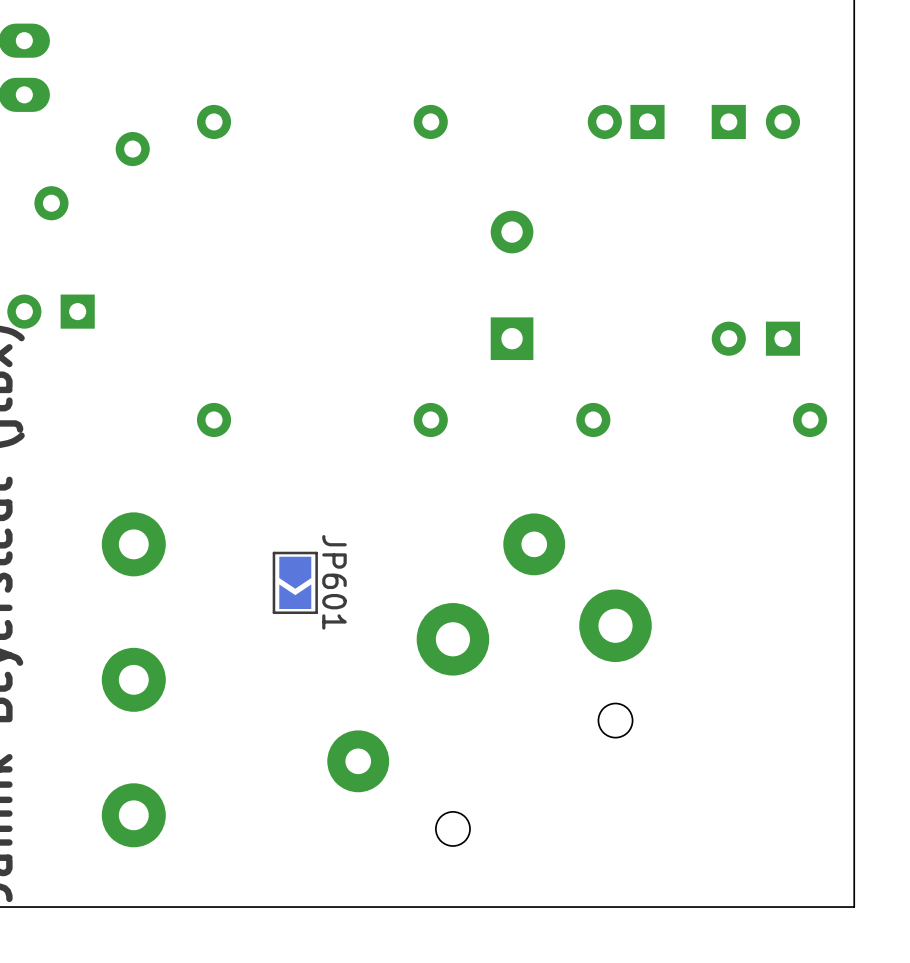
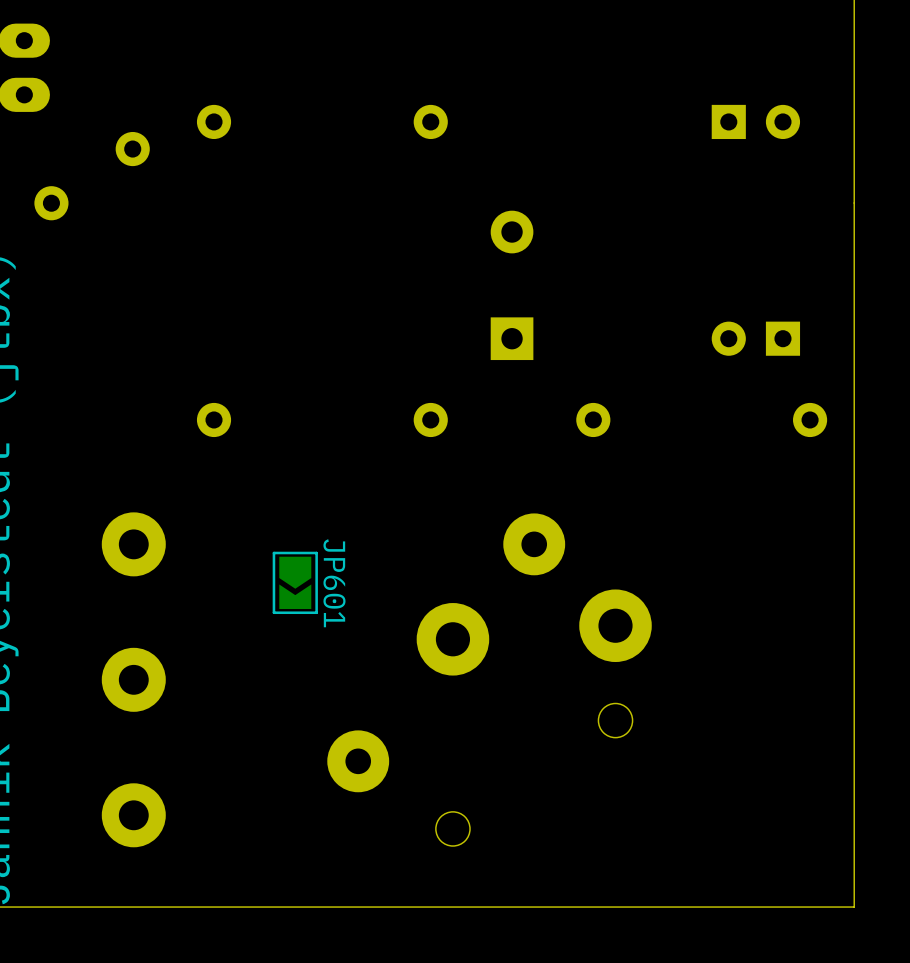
part: (626, 121) -> none
part: (51, 311) -> none

